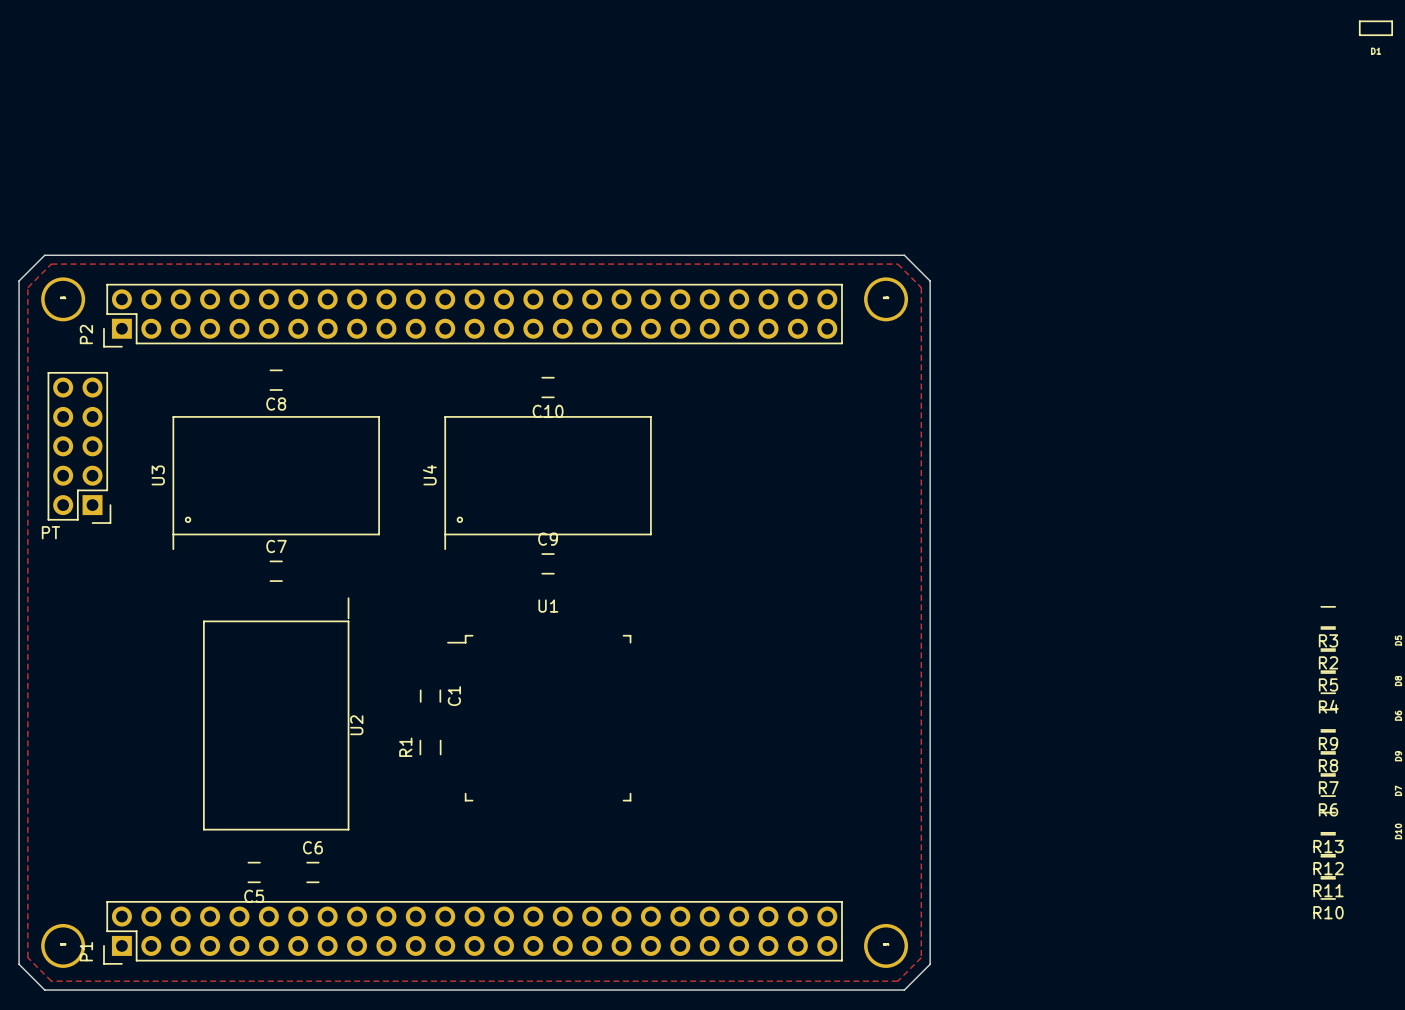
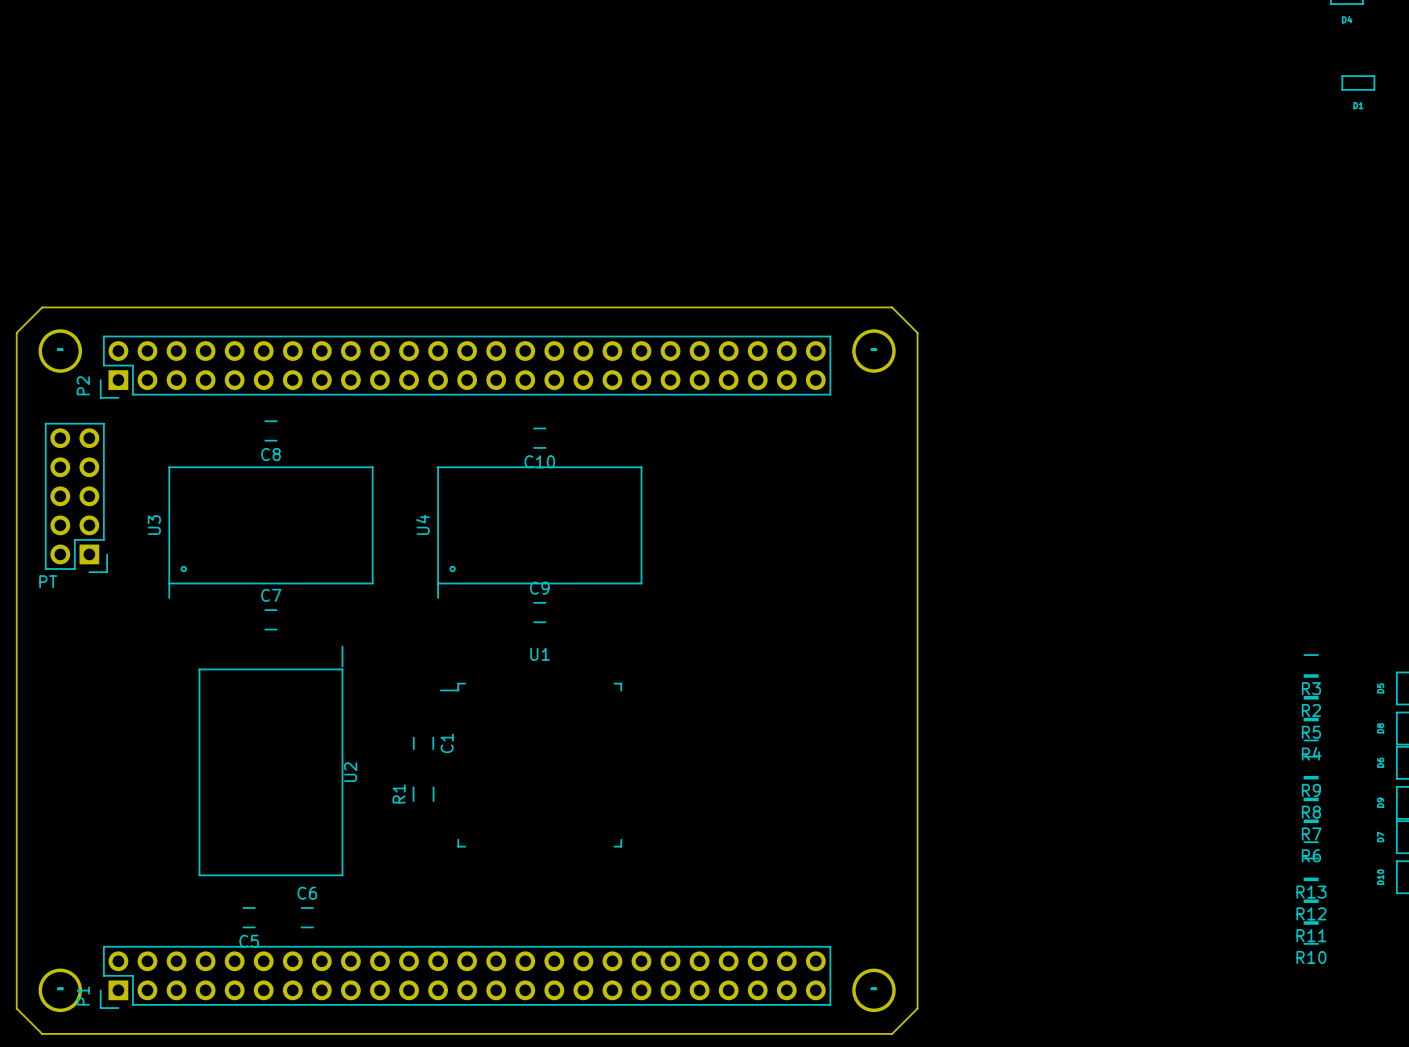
zone outline: (51, 264) (27, 287) (27, 957) (51, 981) (897, 981) (921, 957) (921, 287) (897, 264) (51, 264) -> none

